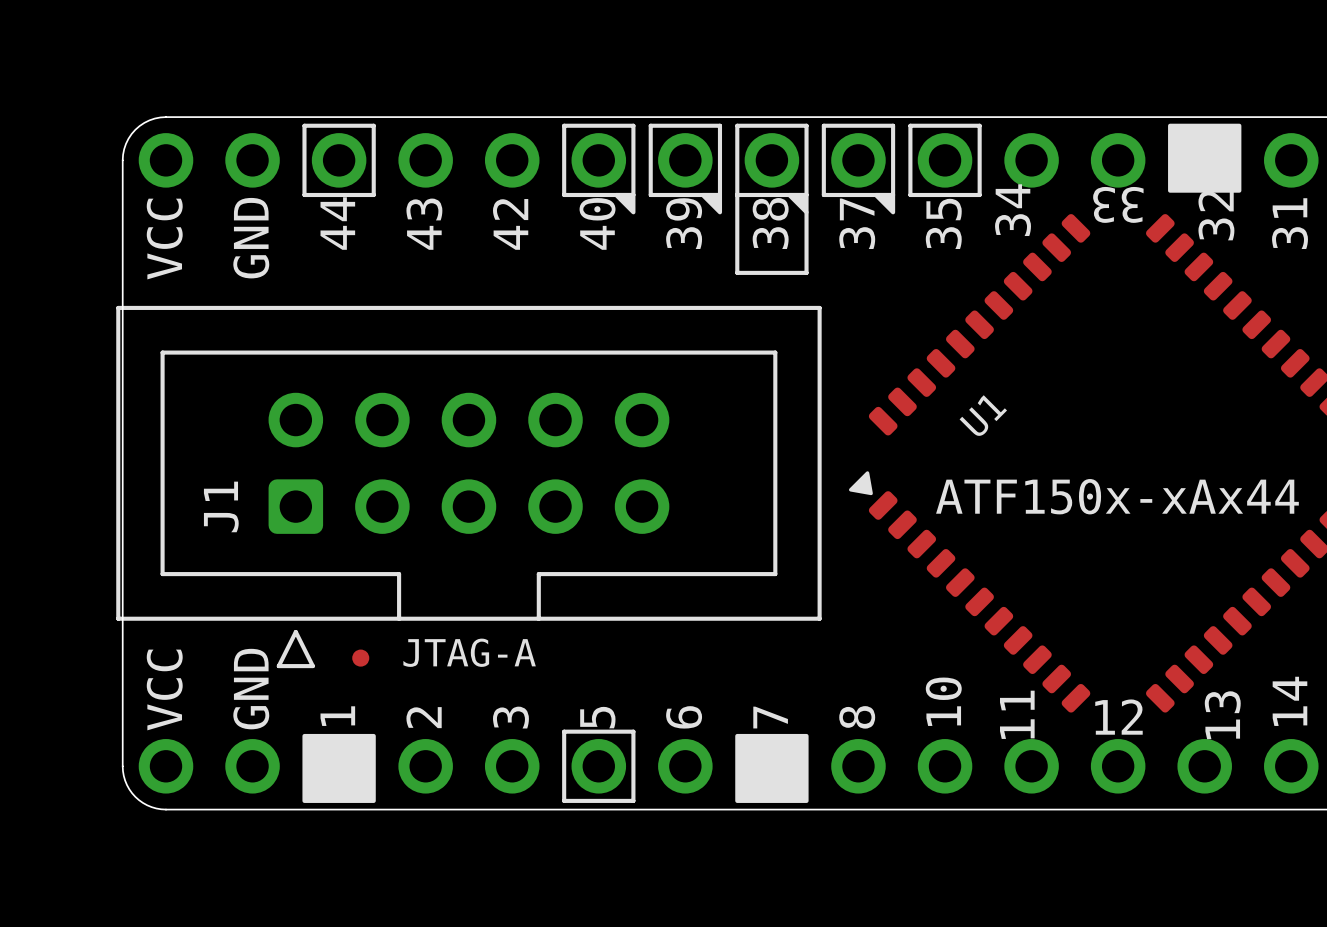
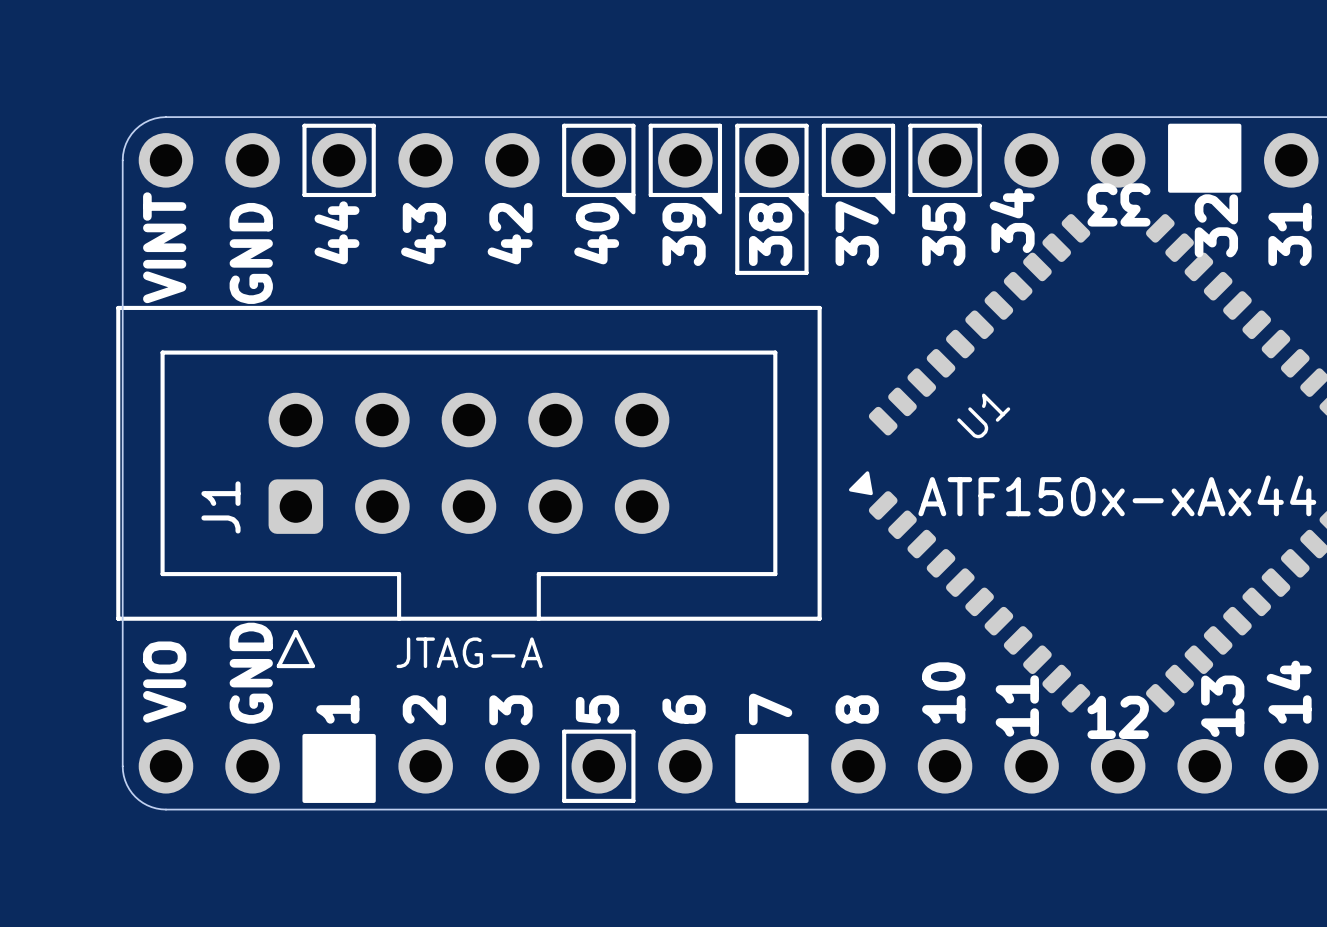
text: VCC (164, 239) -> VINT (164, 247)
part: (360, 658) -> none
text: VCC (164, 689) -> VIO (164, 682)

